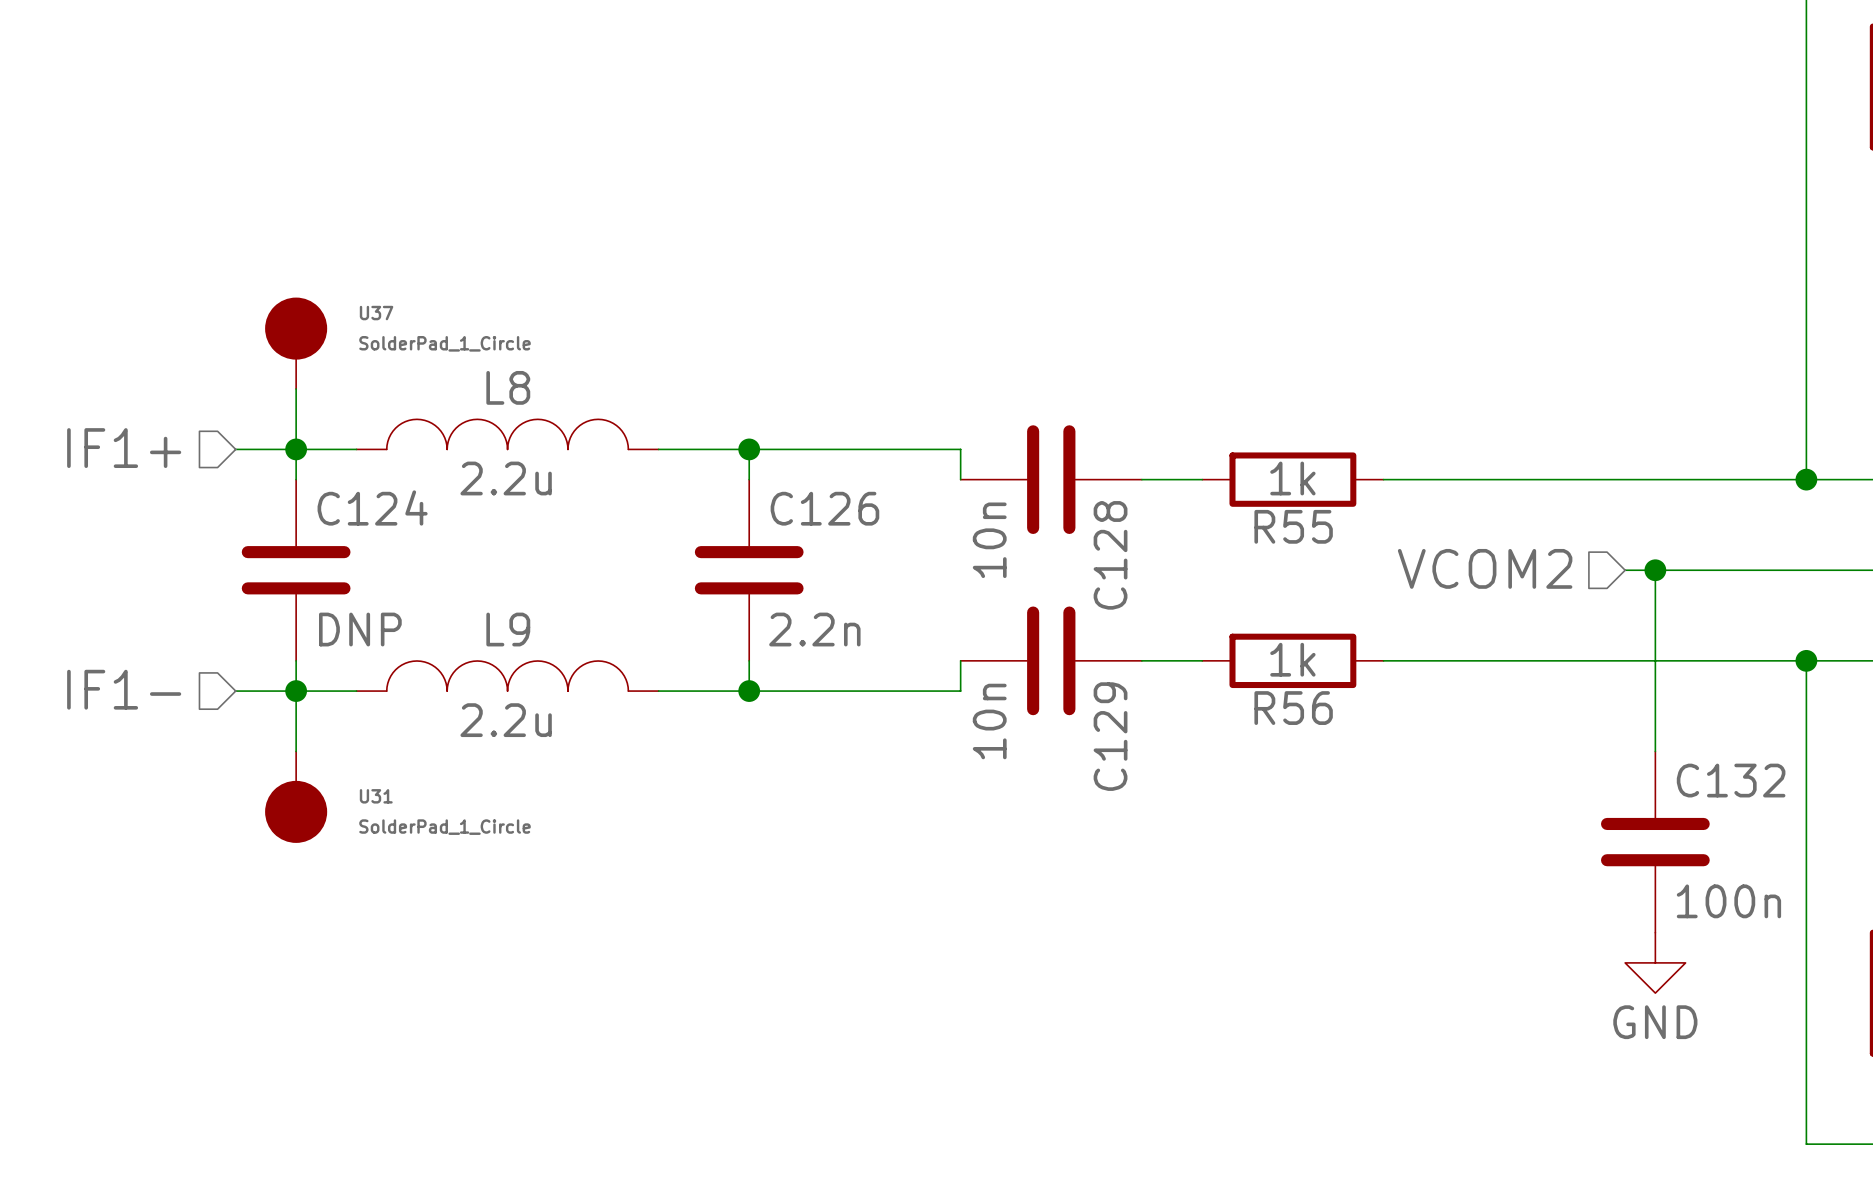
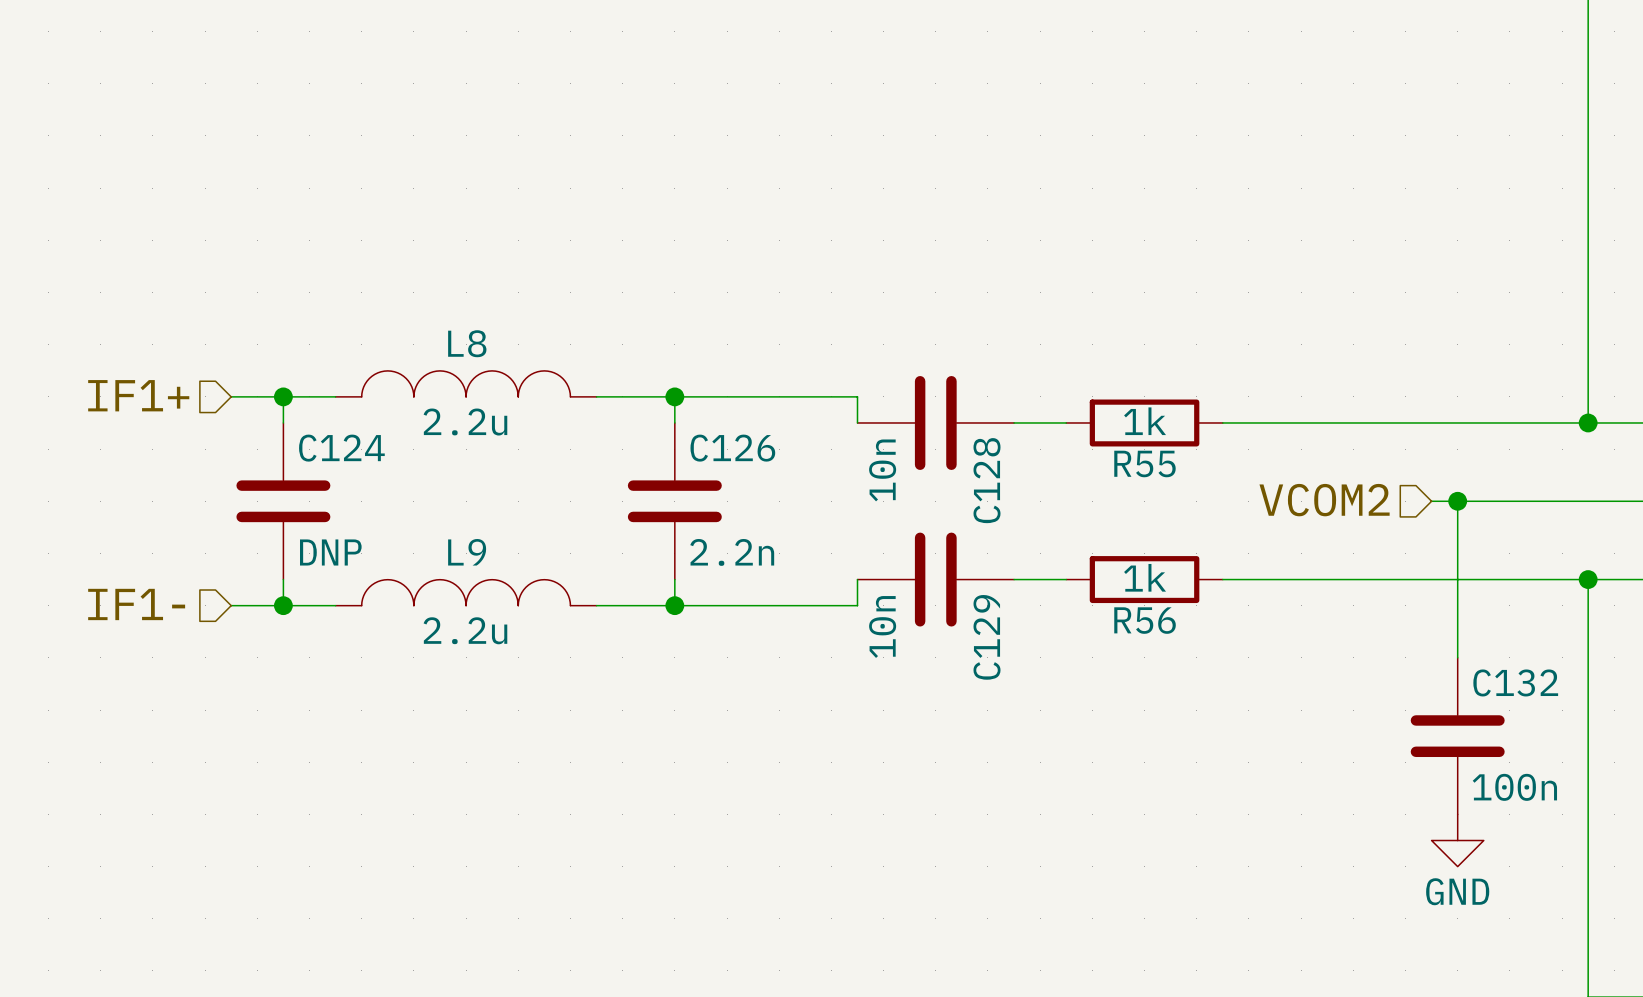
U37: SolderPad_1_Circle (296, 343) -> none
wire: (296, 389) (296, 449) -> none
wire: (296, 691) (296, 751) -> none
U31: SolderPad_1_Circle (296, 796) -> none

